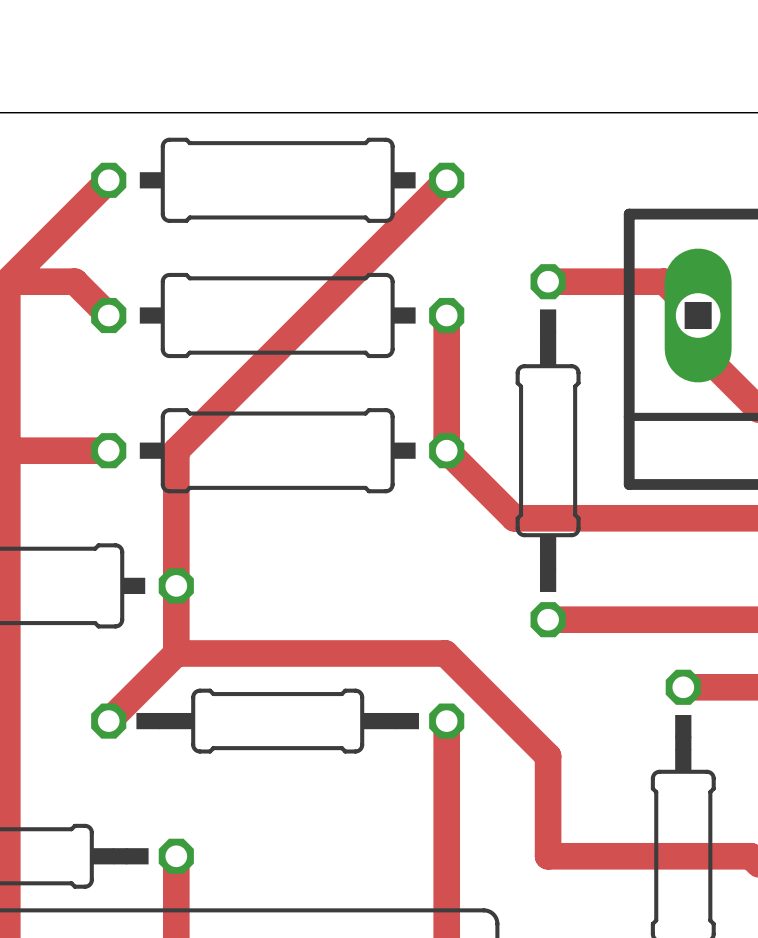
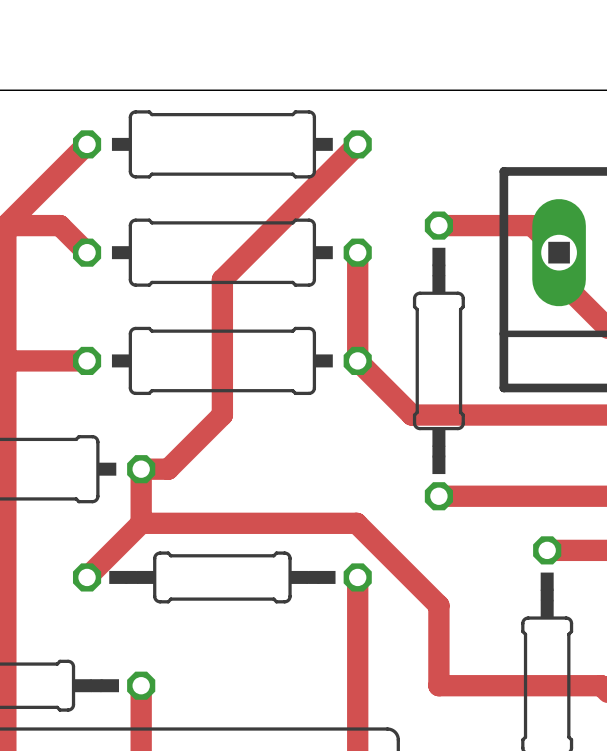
track: (277, 349) (176, 450) (176, 585) -> (222, 279) (222, 415) (168, 469) (141, 469)

